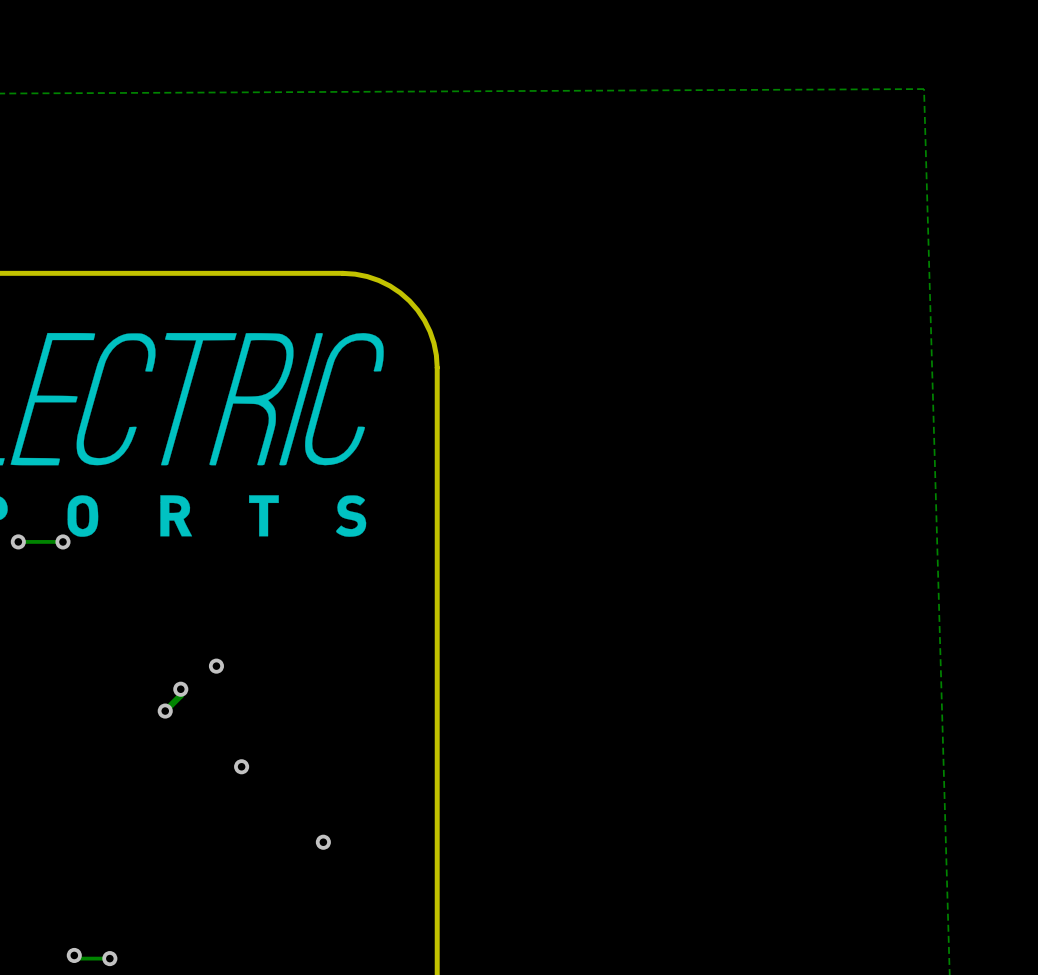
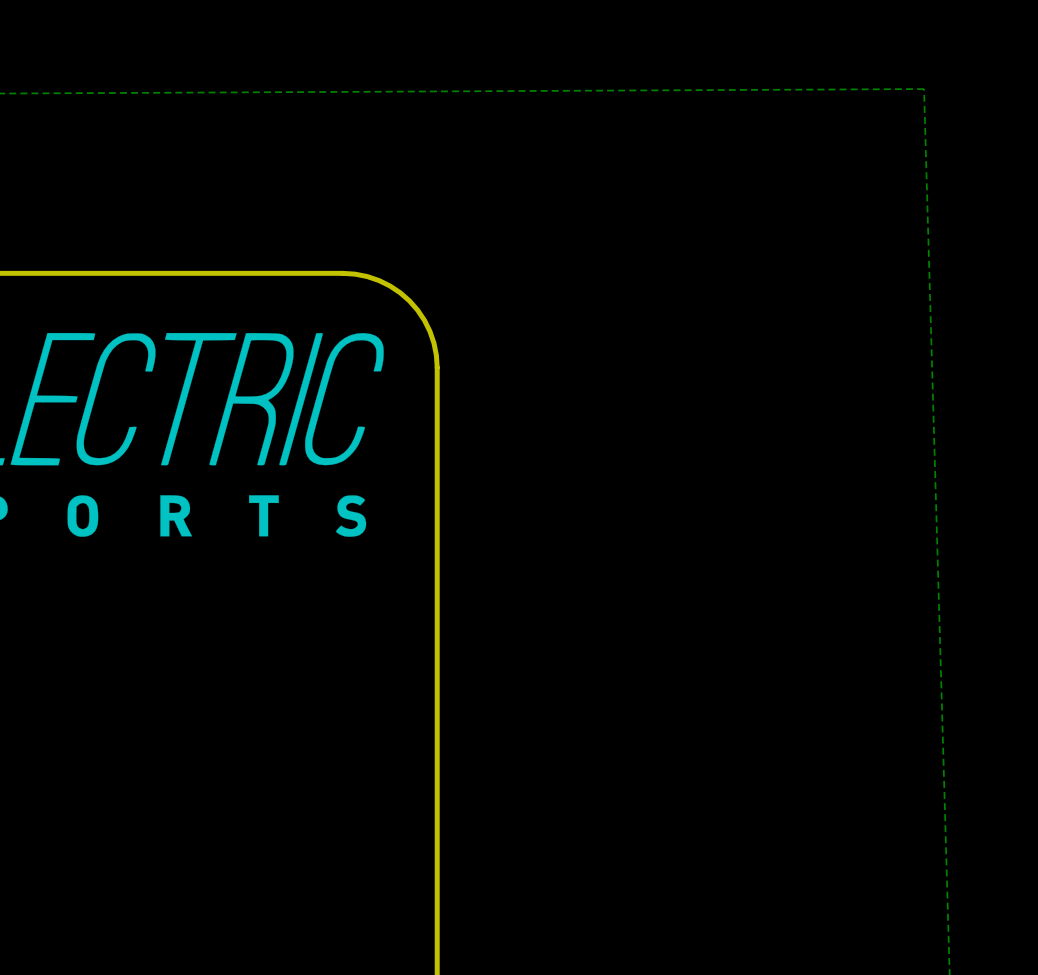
via: (18, 541) -> none
track: (62, 541) (18, 541) -> none
via: (62, 541) -> none
via: (216, 666) -> none
track: (180, 689) (180, 695) (165, 711) -> none
via: (180, 689) -> none
via: (165, 711) -> none
via: (241, 766) -> none
via: (323, 842) -> none
track: (74, 955) (77, 958) (109, 958) -> none
via: (74, 955) -> none
via: (109, 958) -> none

